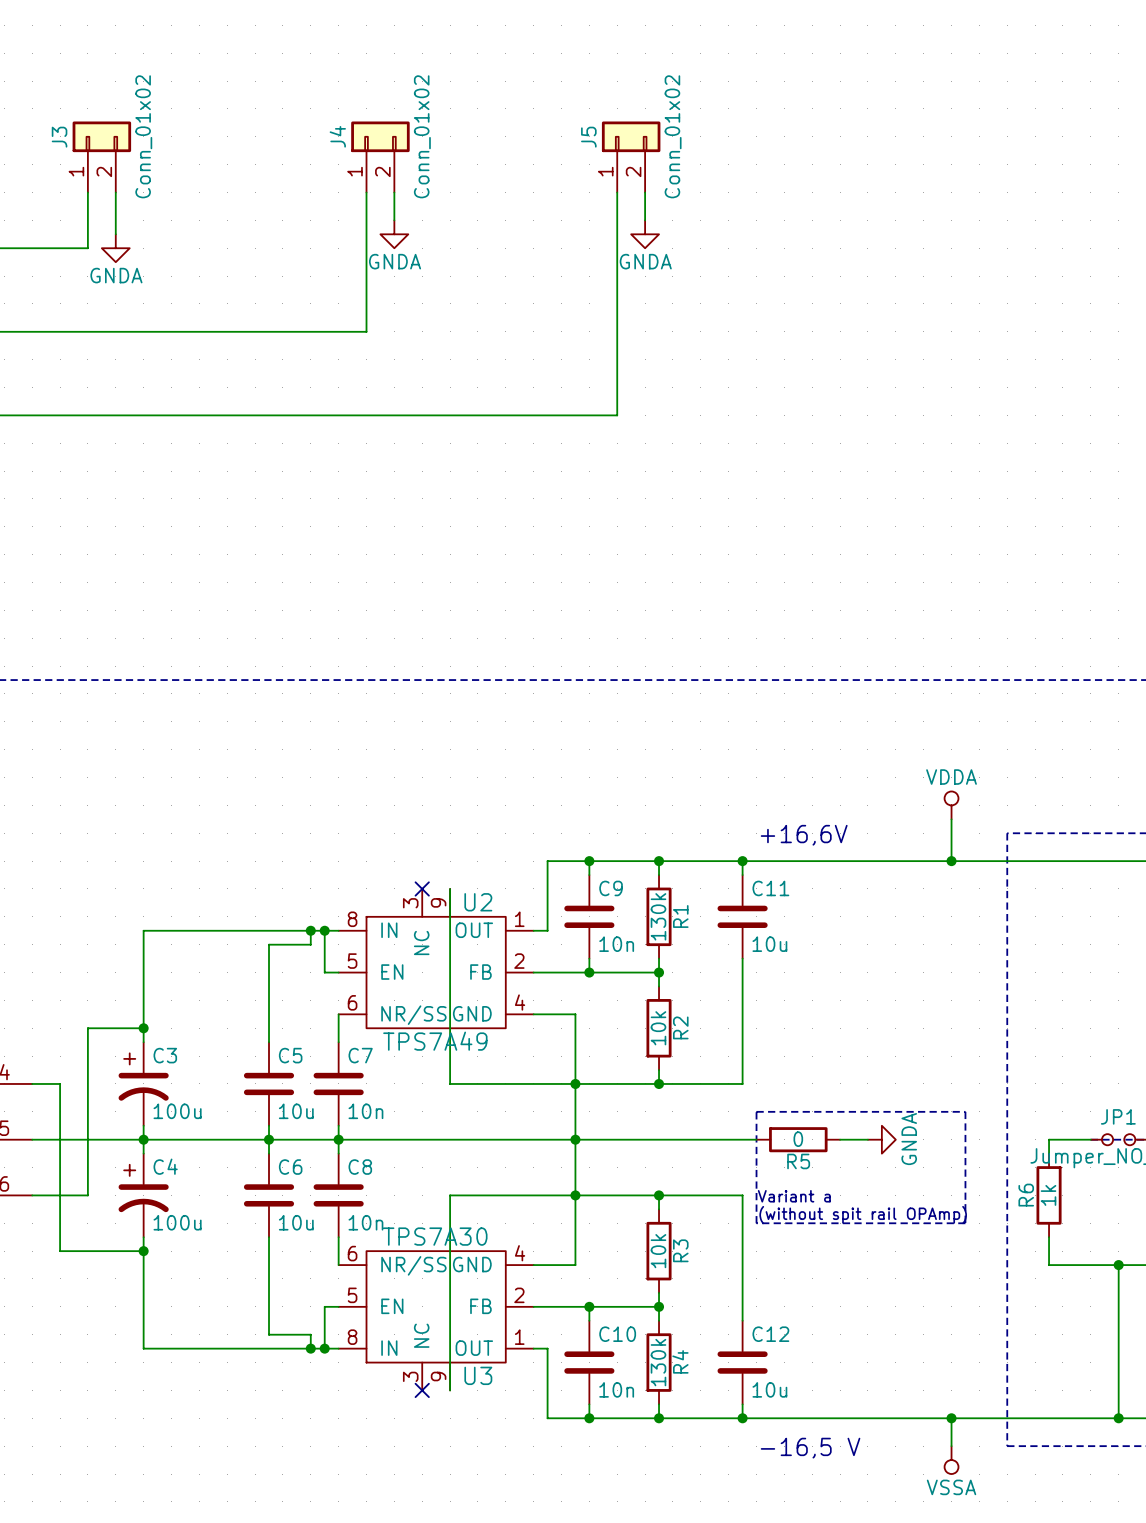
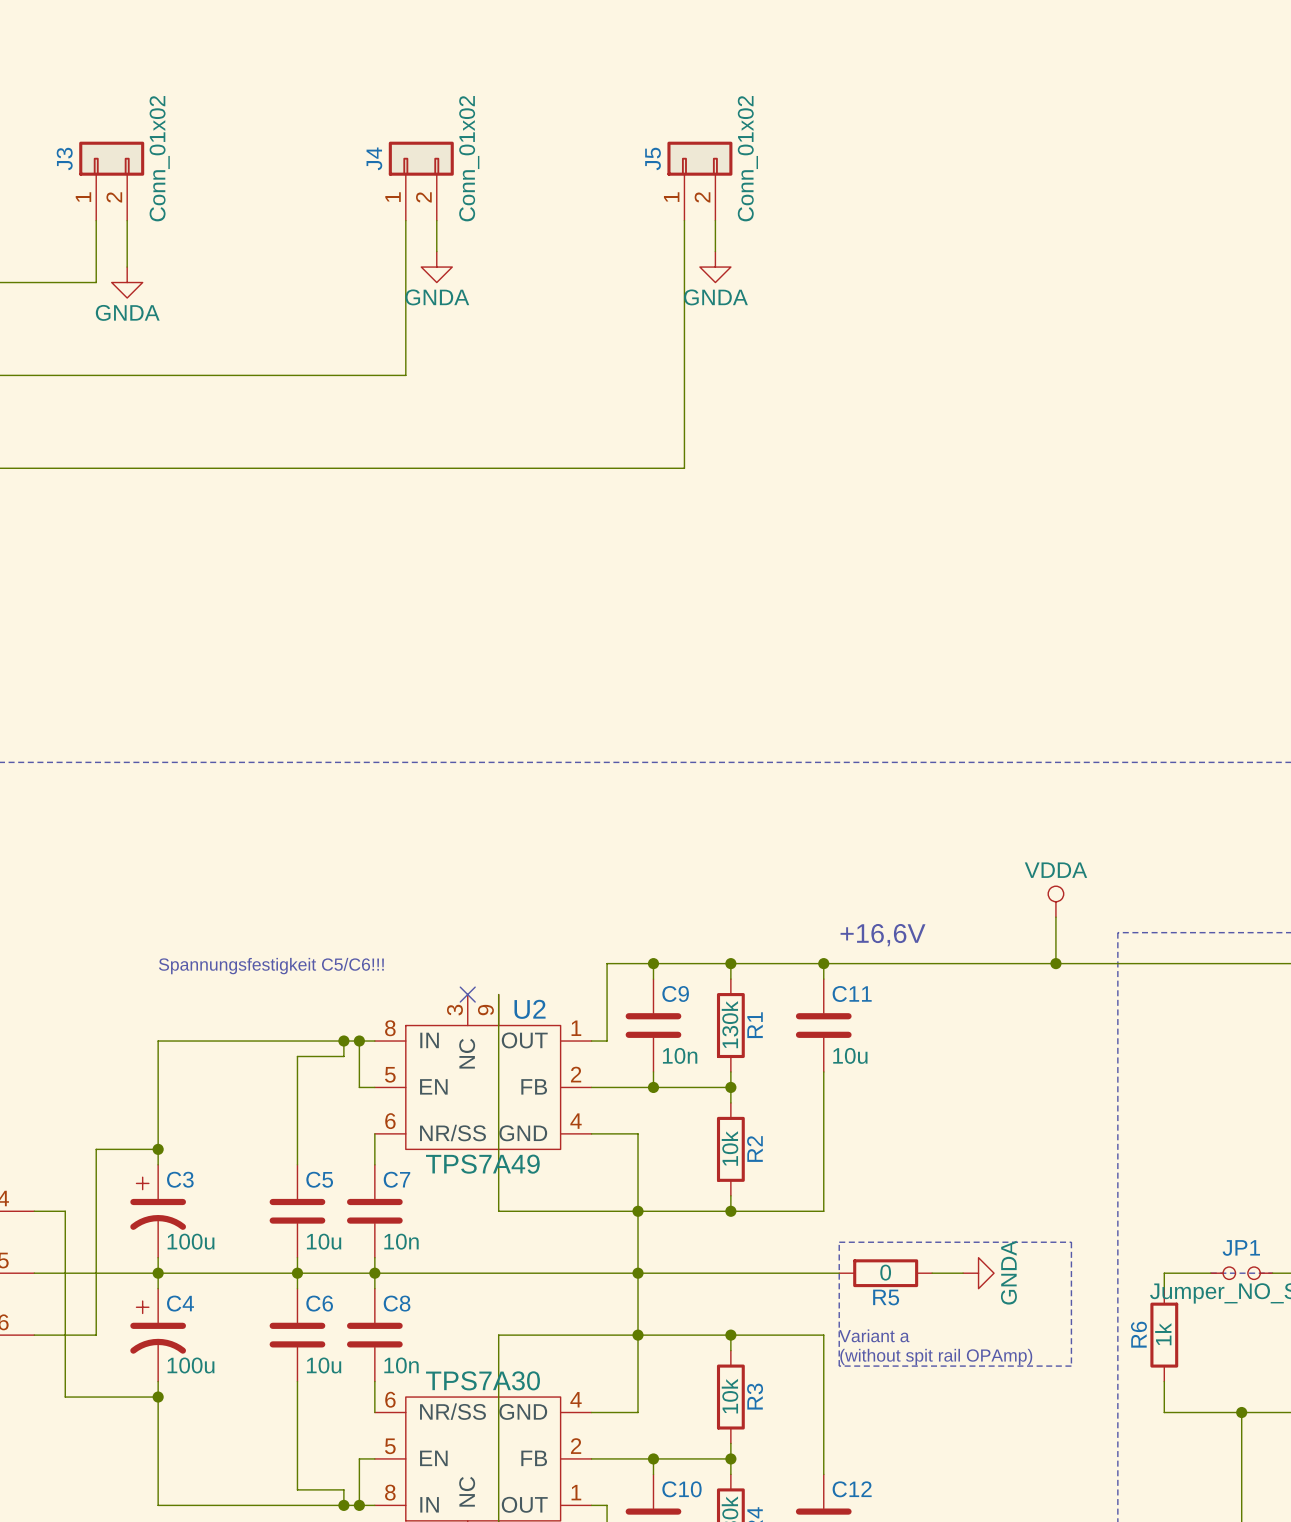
text: none -> Spannungsfestigkeit C5/C6!!! (271, 966)

